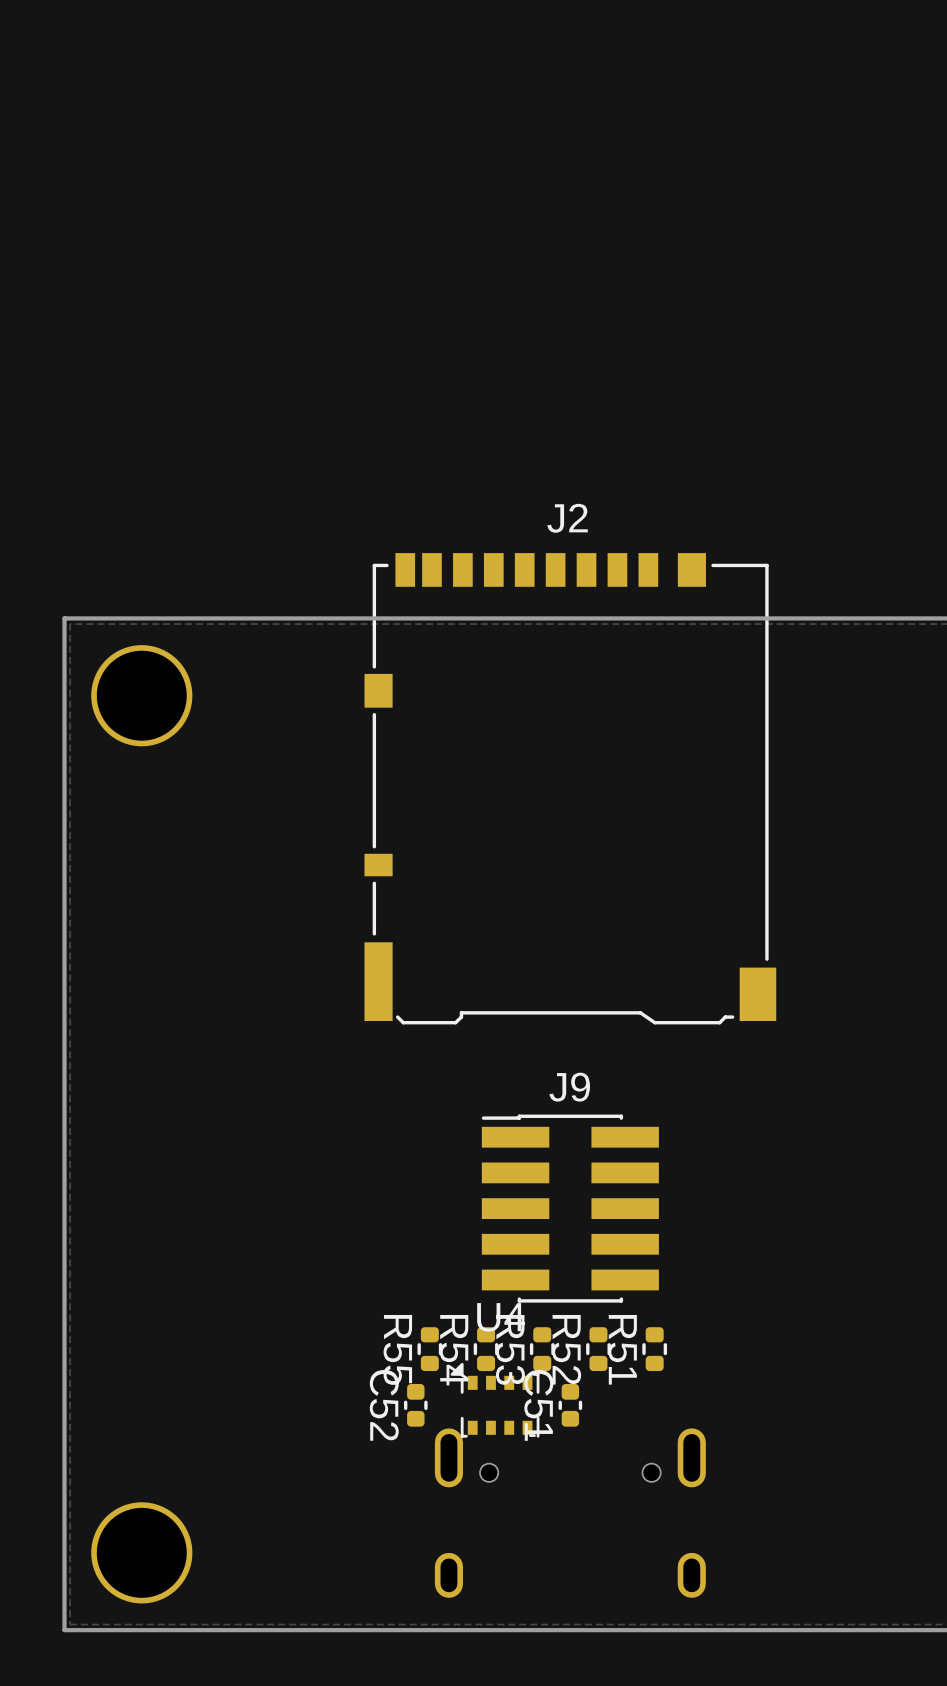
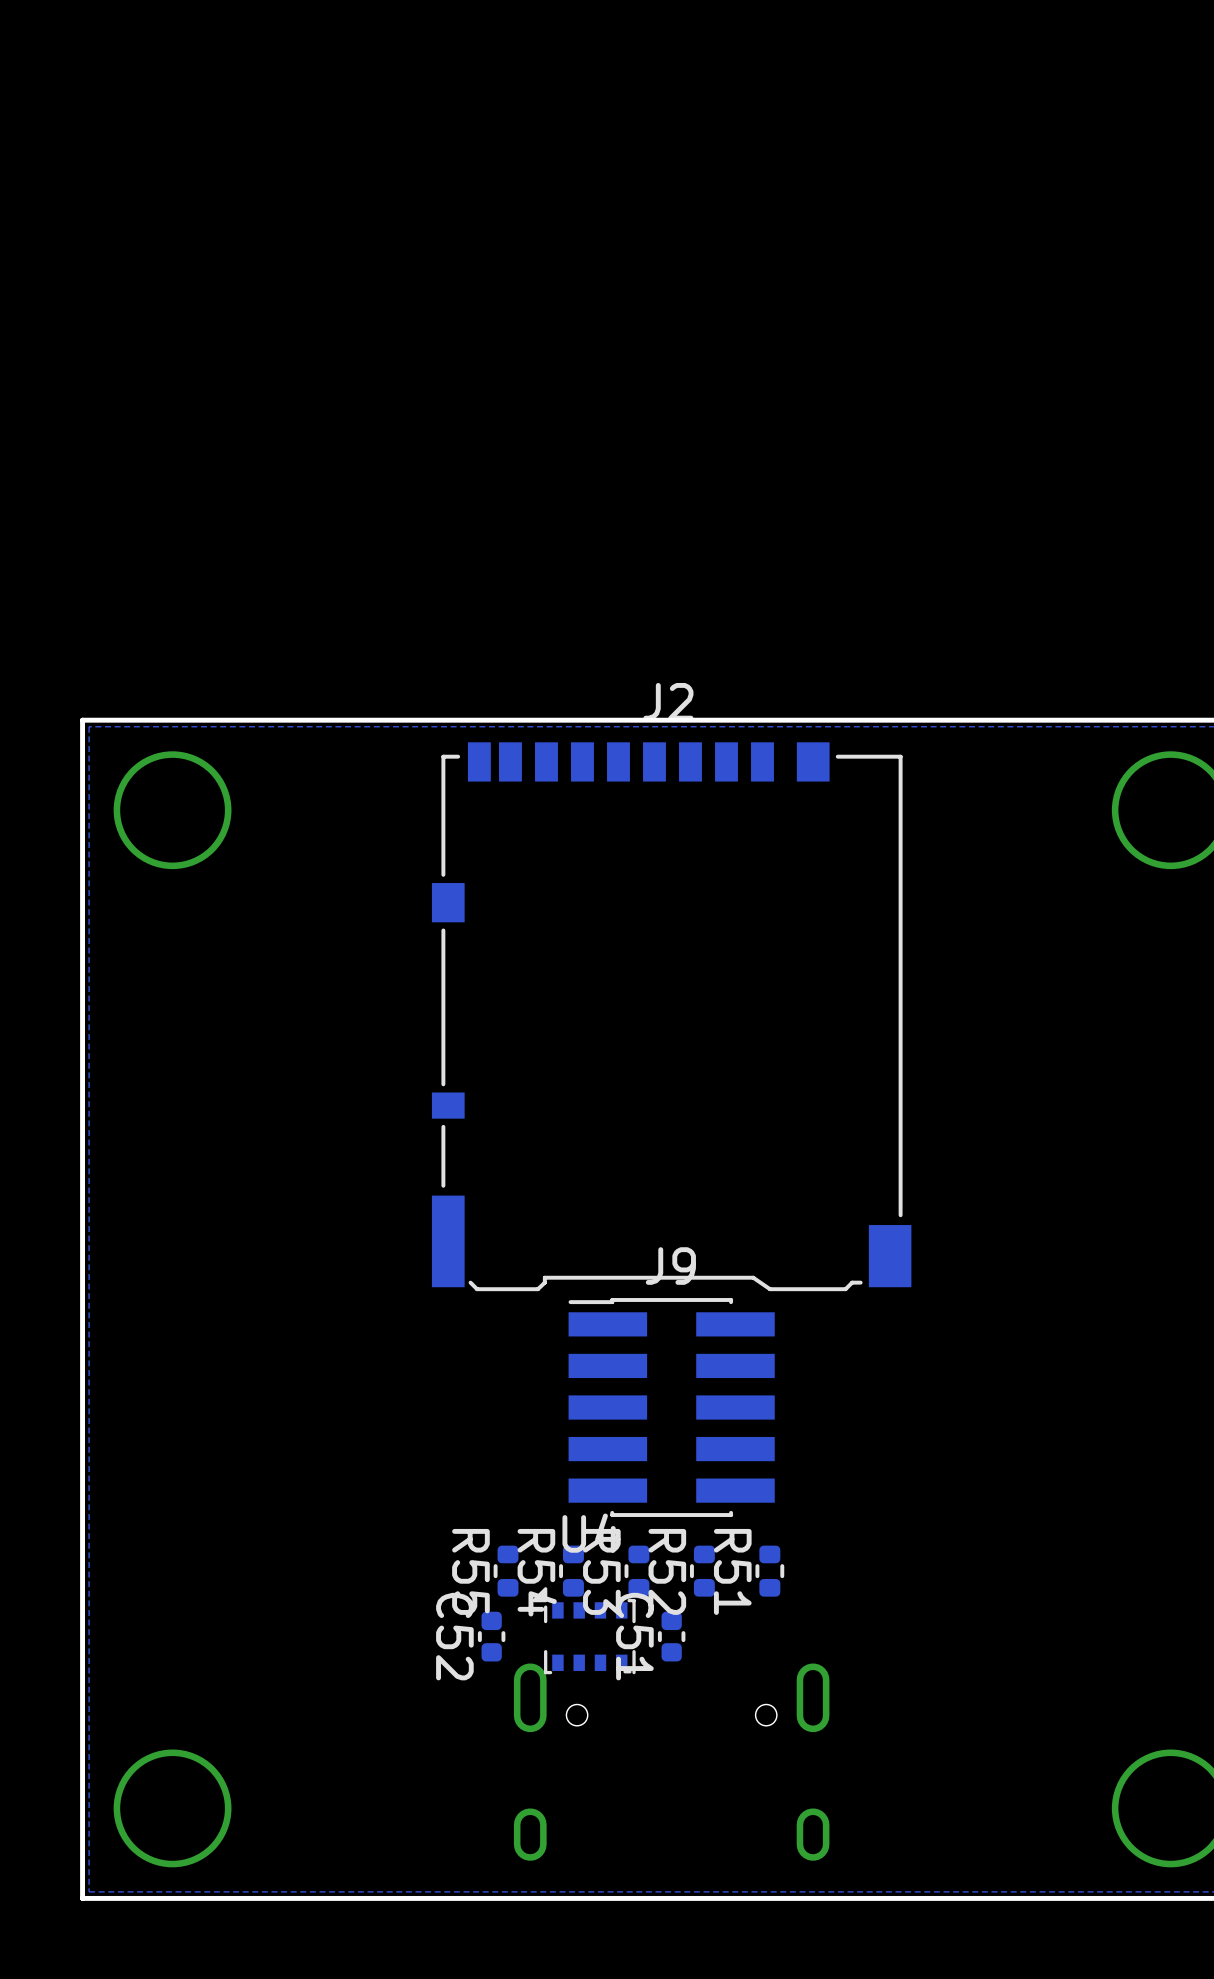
J2 position: (570, 788) -> (671, 1016)

